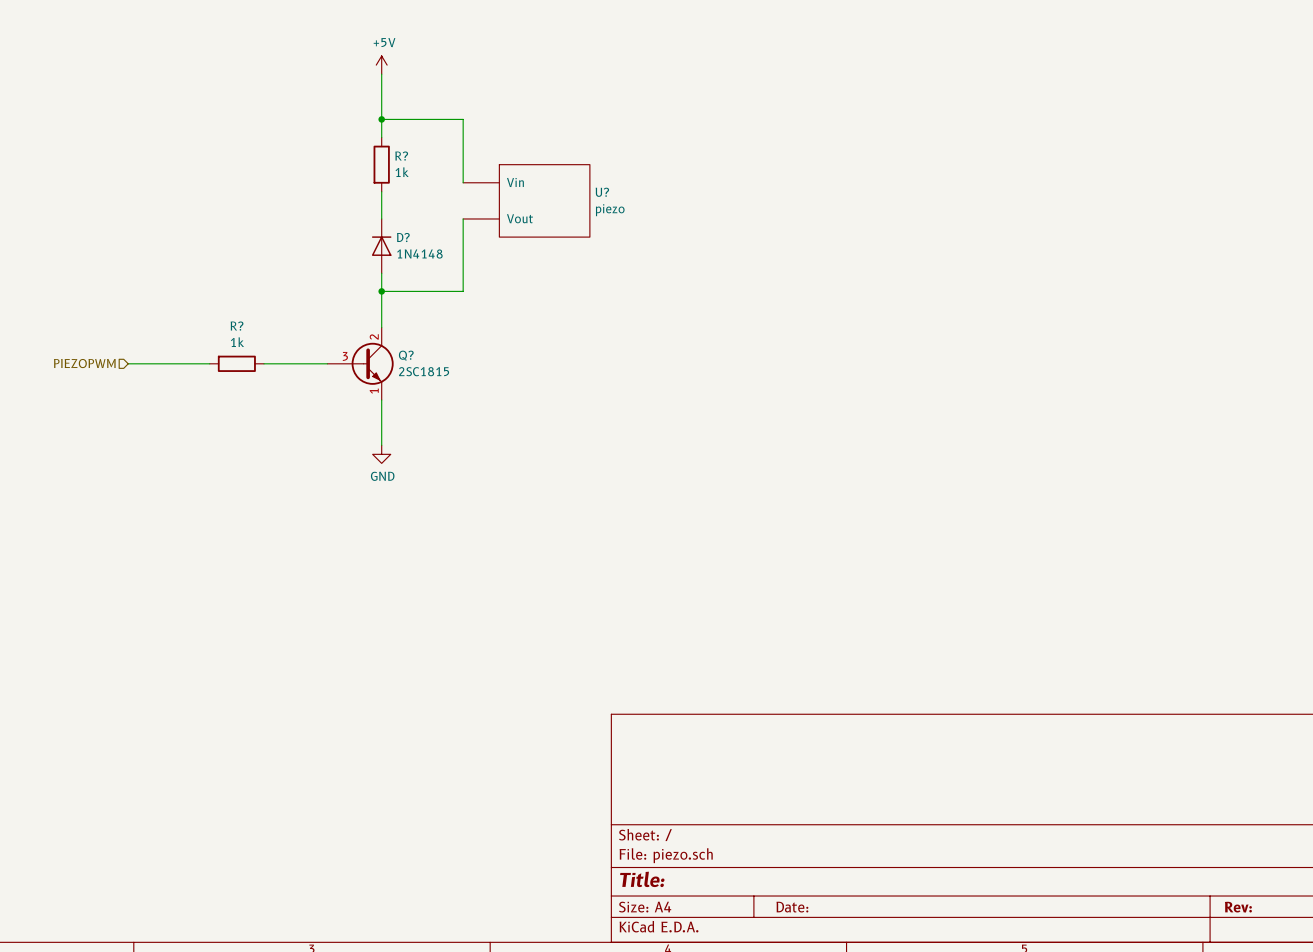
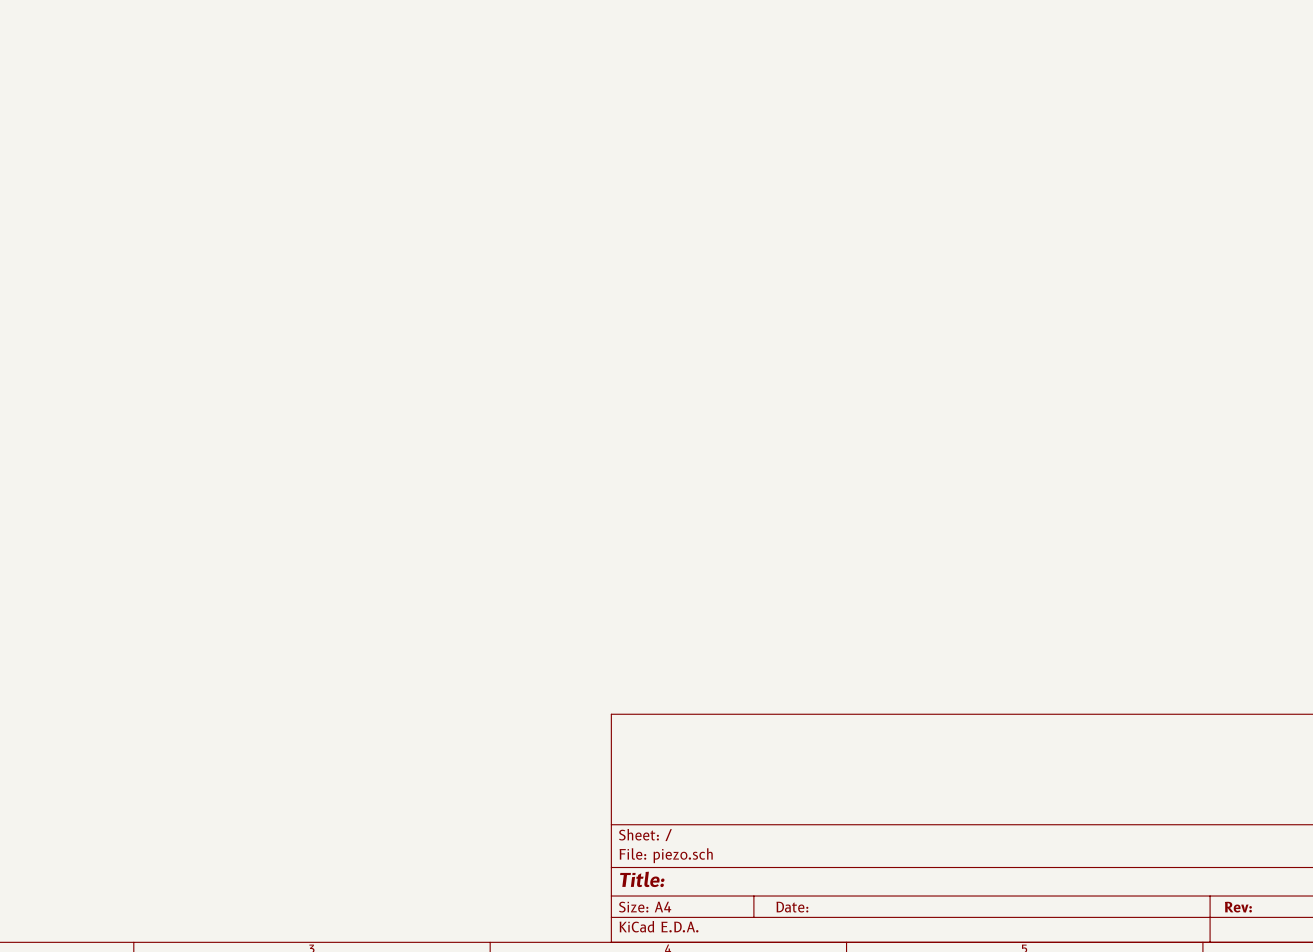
power symbol: +5V (381, 65) -> none
wire: (381, 74) (381, 137) -> none
wire: (381, 119) (463, 119) (463, 182) -> none
junction: (381, 119) -> none
R?: 1k (381, 164) -> none
wire: (381, 191) (381, 218) -> none
U?: piezo (526, 200) -> none
wire: (463, 218) (463, 291) (381, 291) -> none
D?: 1N4148 (381, 246) -> none
wire: (381, 273) (381, 327) -> none
junction: (381, 291) -> none
hierarchical label: PIEZOPWM (84, 363) -> none
wire: (128, 363) (209, 363) -> none
R?: 1k (236, 363) -> none
wire: (264, 363) (327, 363) -> none
Q?: 2SC1815 (360, 363) -> none
wire: (381, 400) (381, 445) -> none
power symbol: GND (381, 454) -> none

